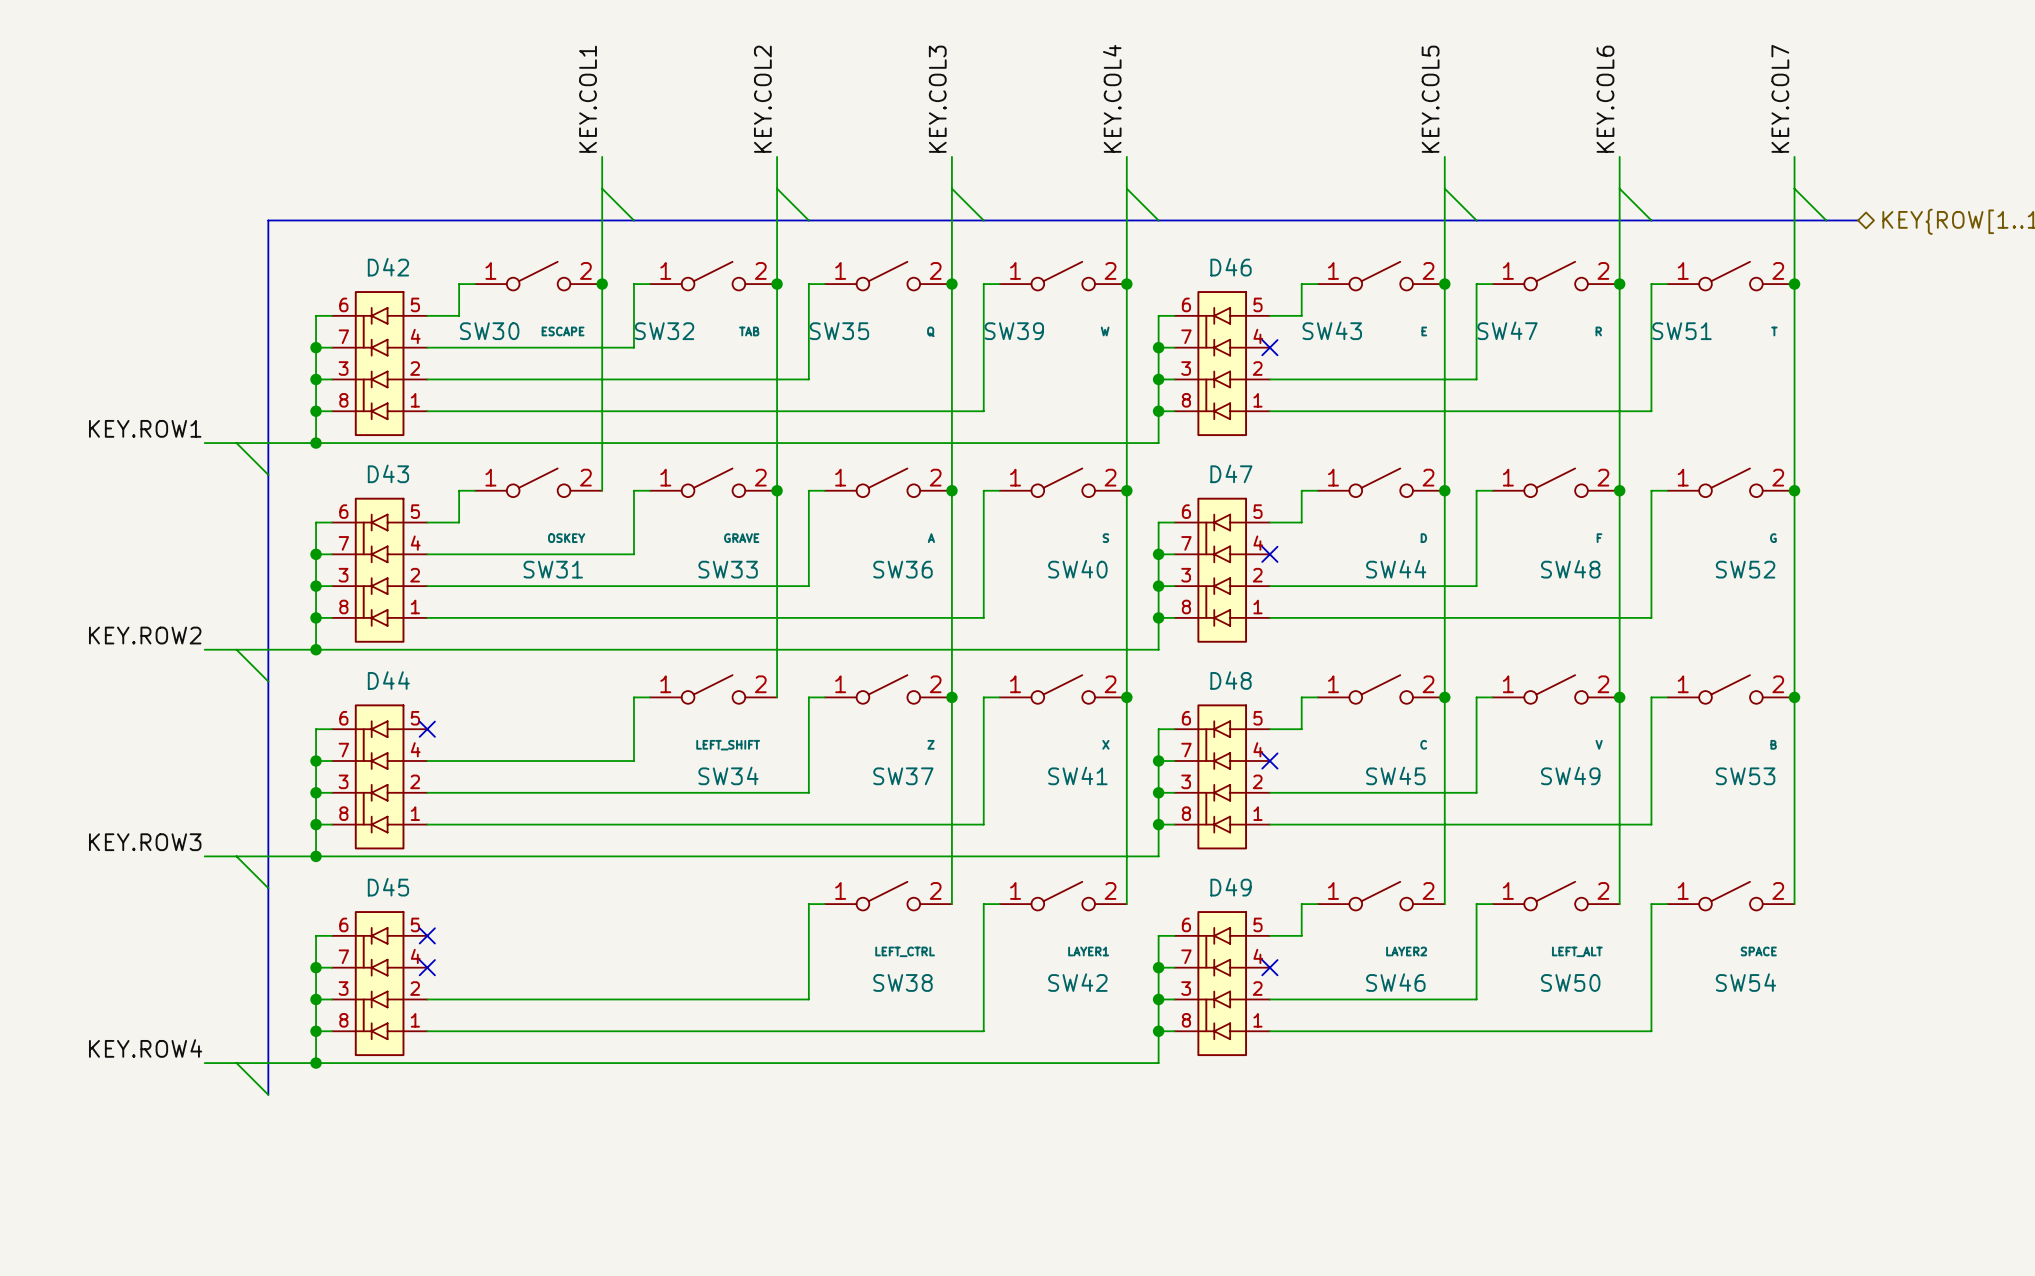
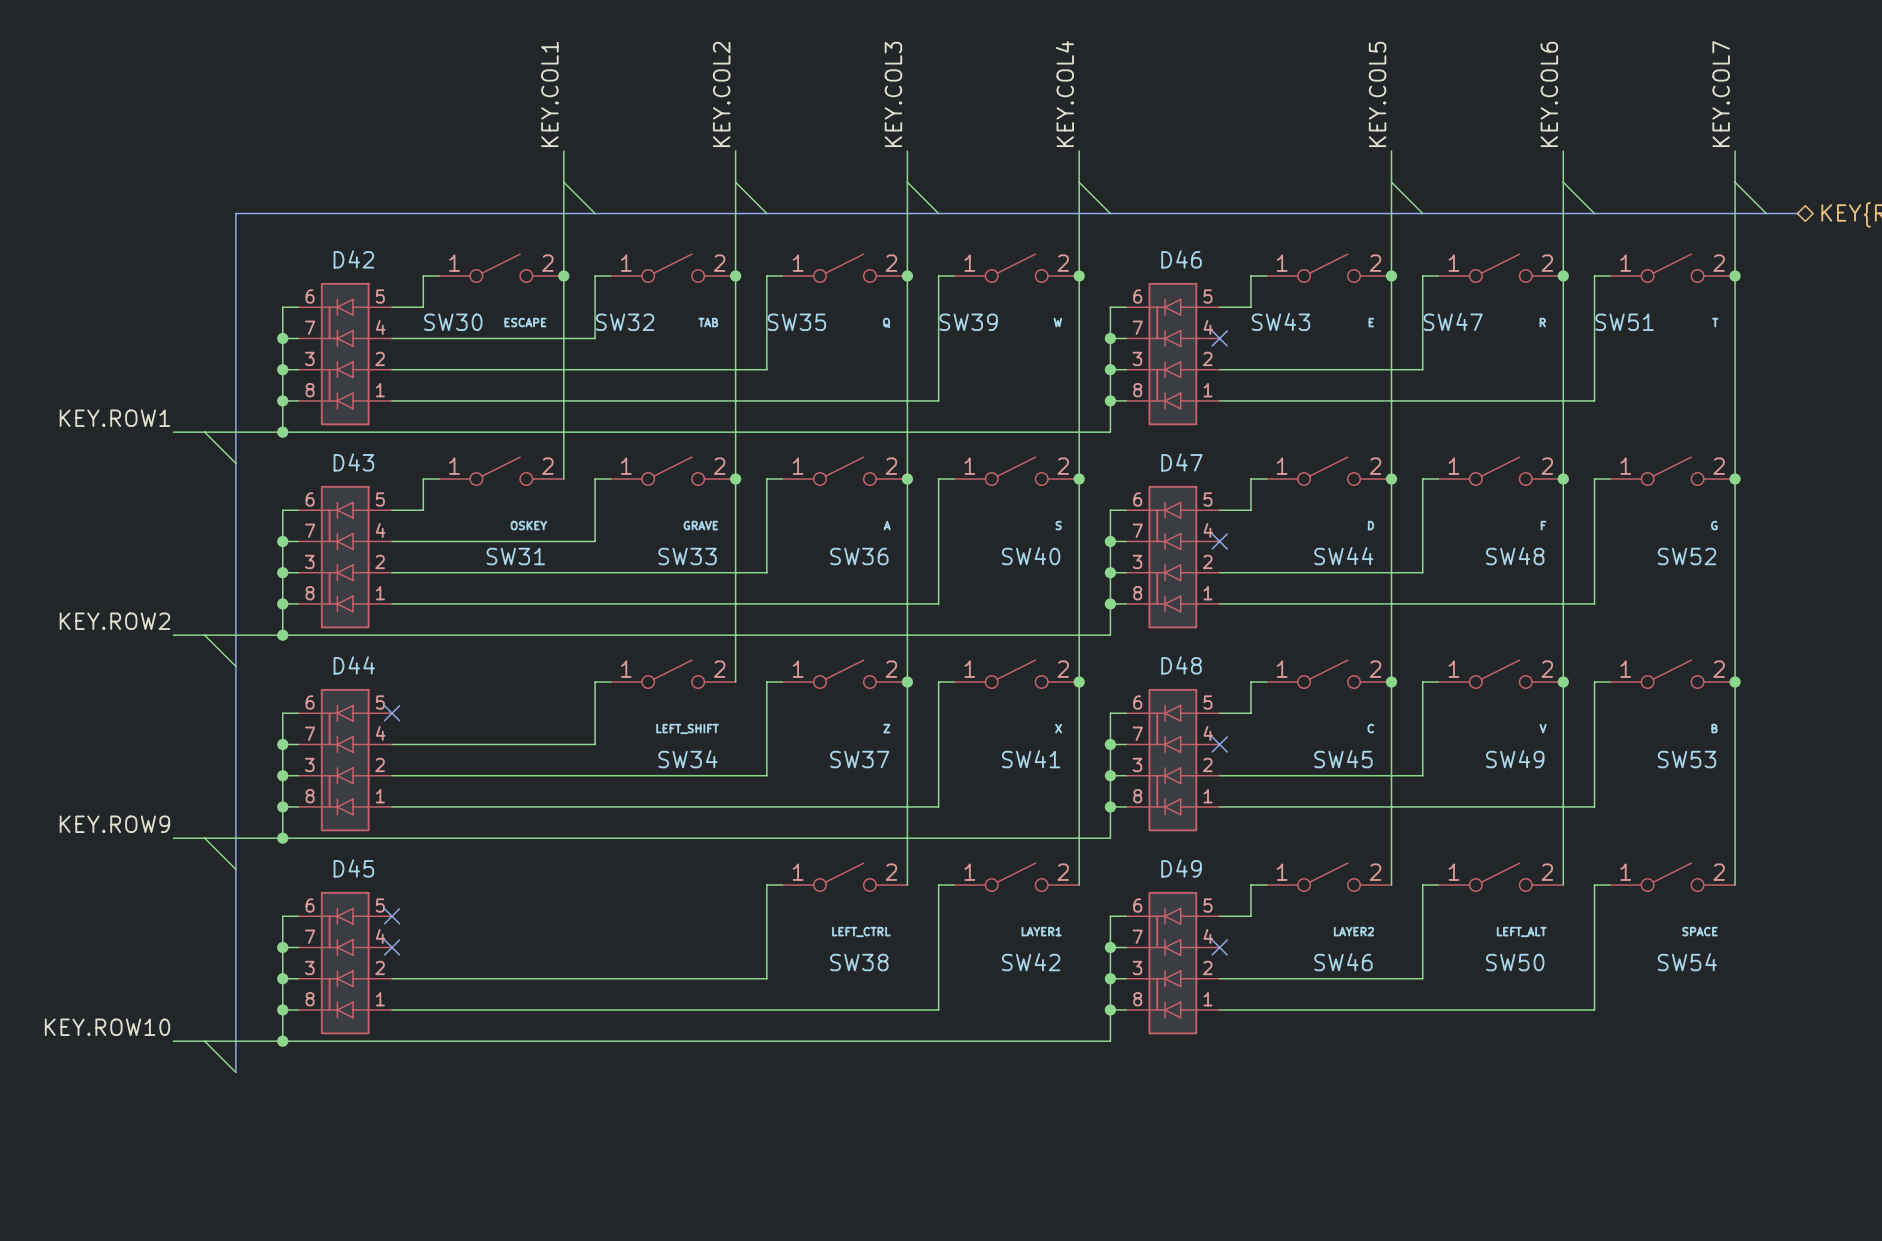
label: KEY.ROW3 (145, 842) -> KEY.ROW9 (114, 824)
label: KEY.ROW4 (145, 1048) -> KEY.ROW10 (107, 1027)

